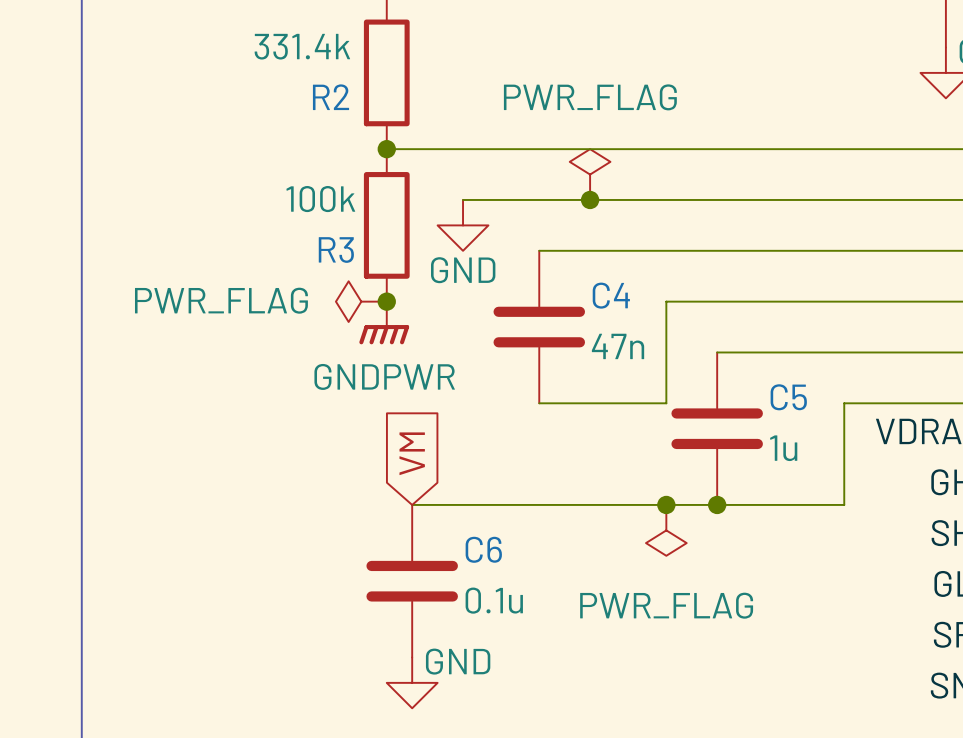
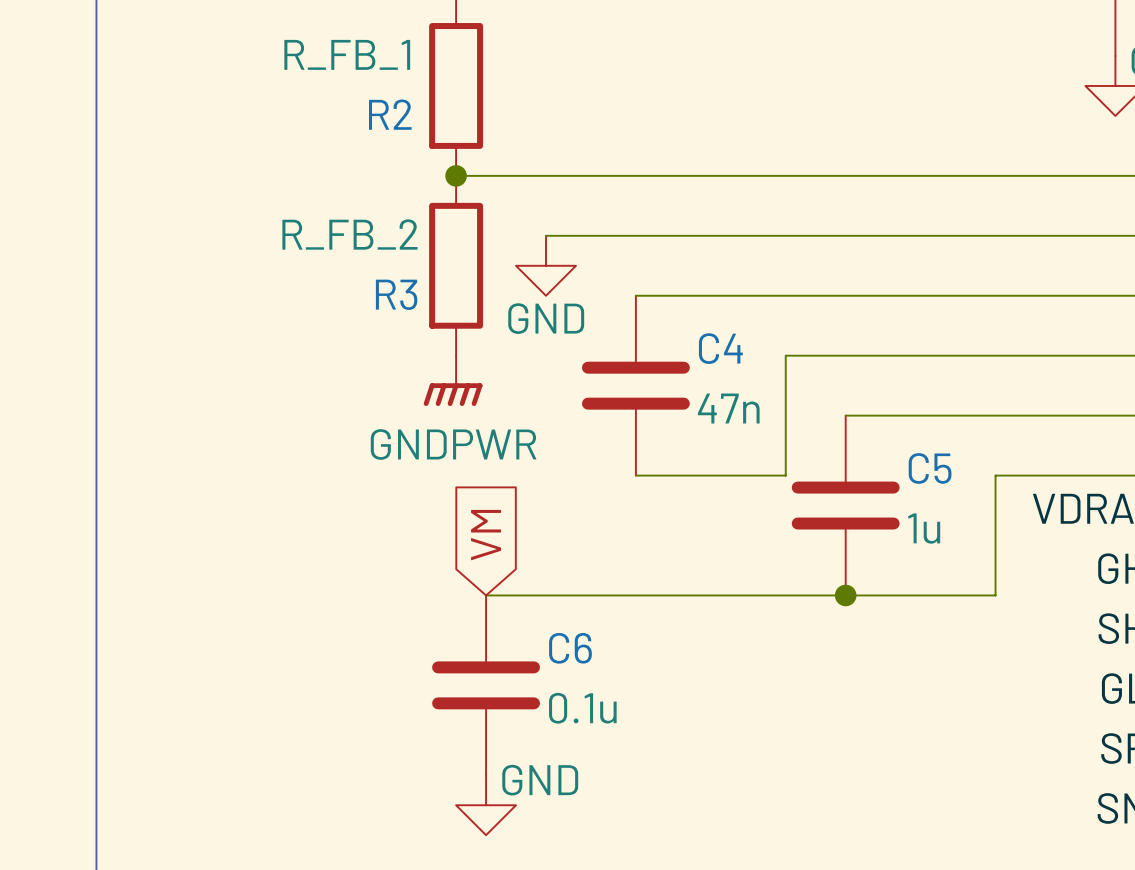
R2 value: 331.4k (302, 46) -> R_FB_1 (347, 54)
power symbol: PWR_FLAG (590, 174) -> none
R3 value: 100k (320, 199) -> R_FB_2 (350, 234)
junction: (590, 199) -> none
power symbol: PWR_FLAG (361, 301) -> none
junction: (386, 301) -> none
junction: (666, 504) -> none
power symbol: PWR_FLAG (666, 530) -> none

